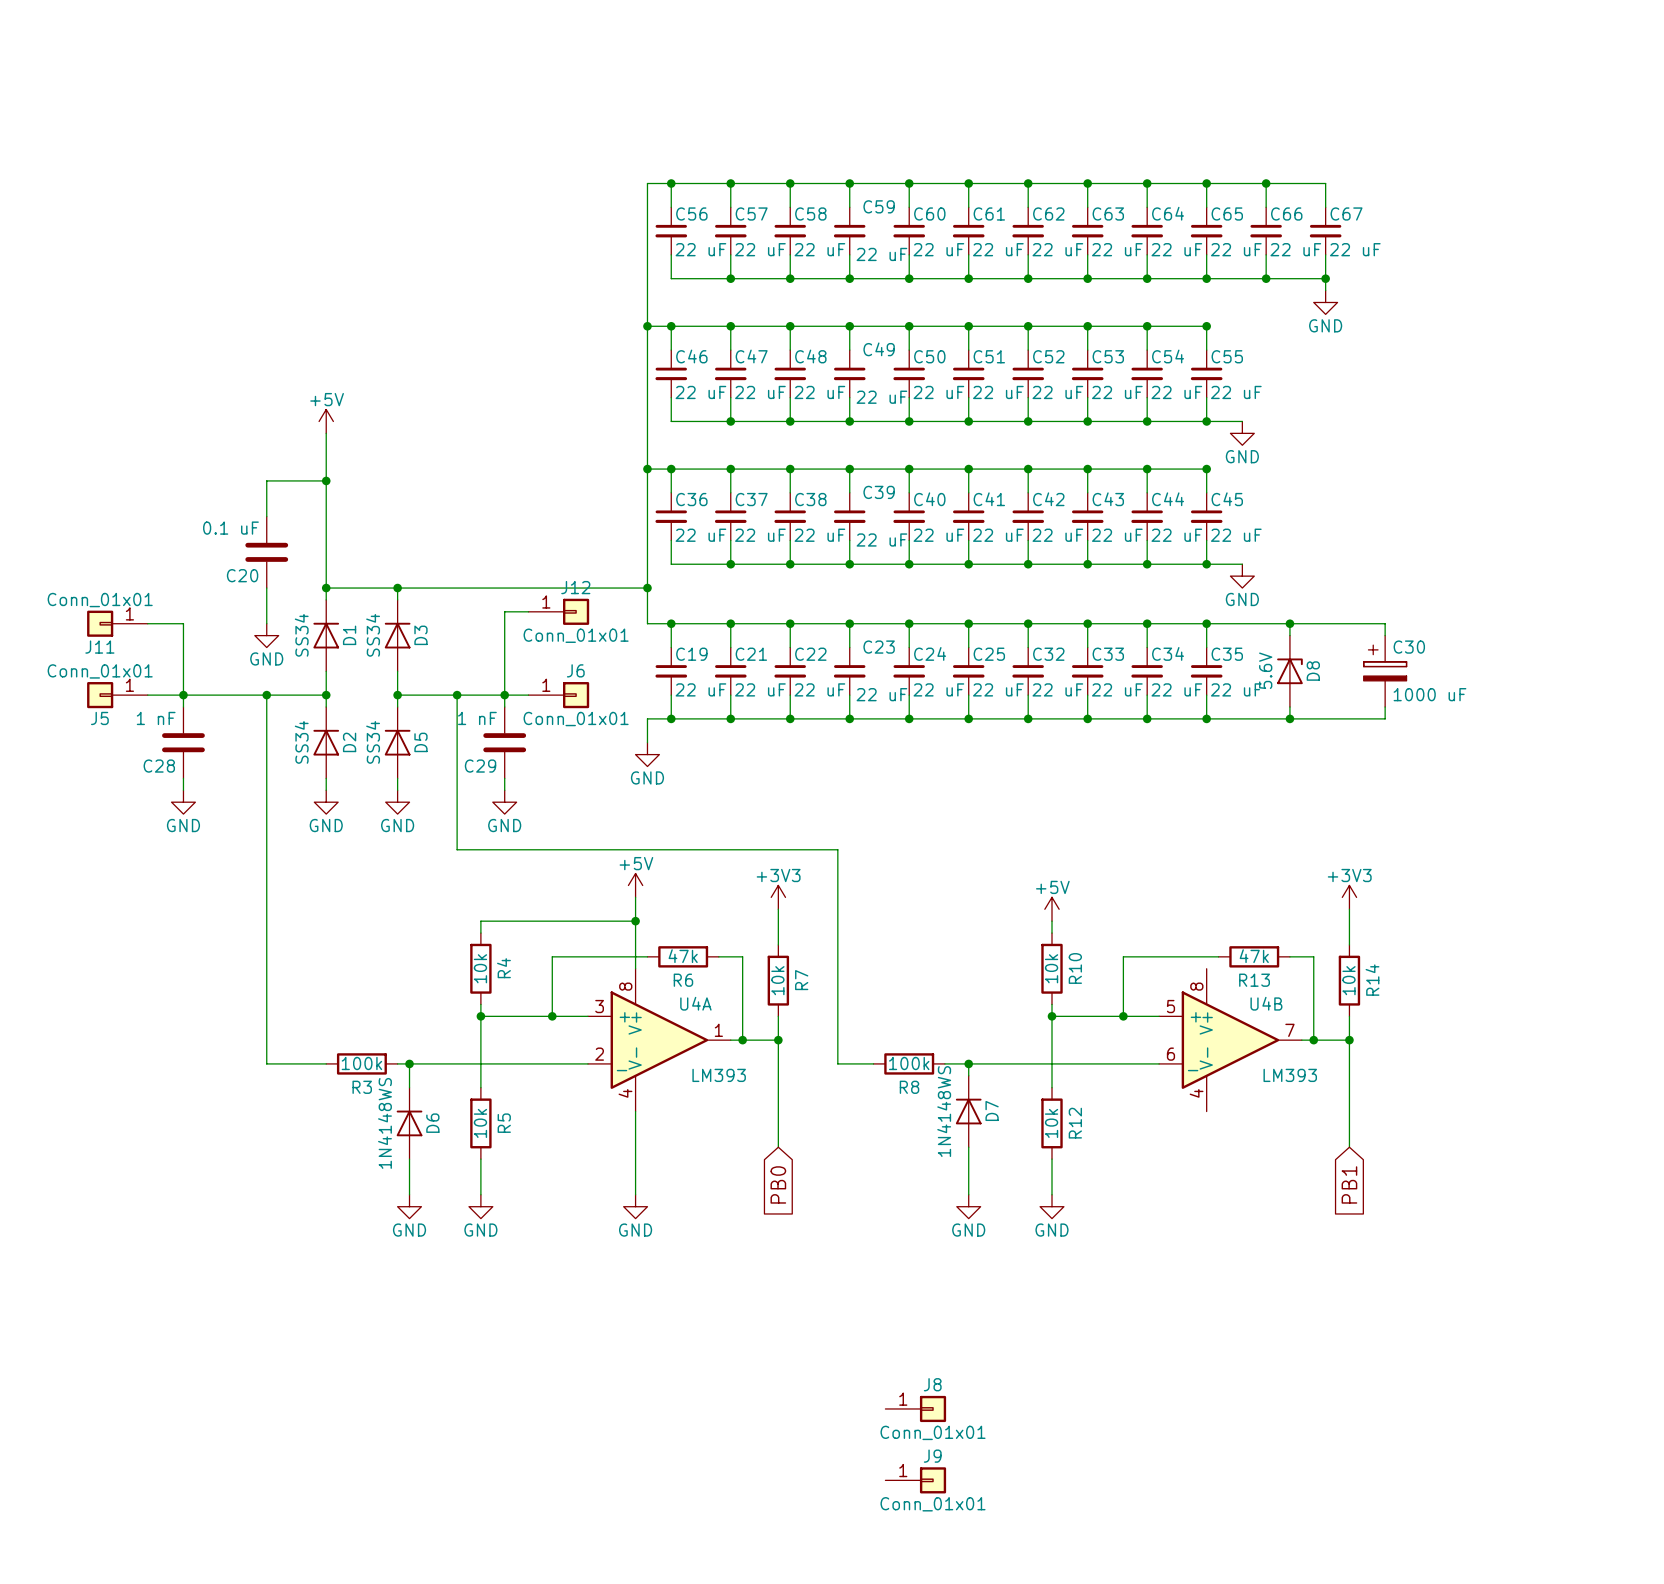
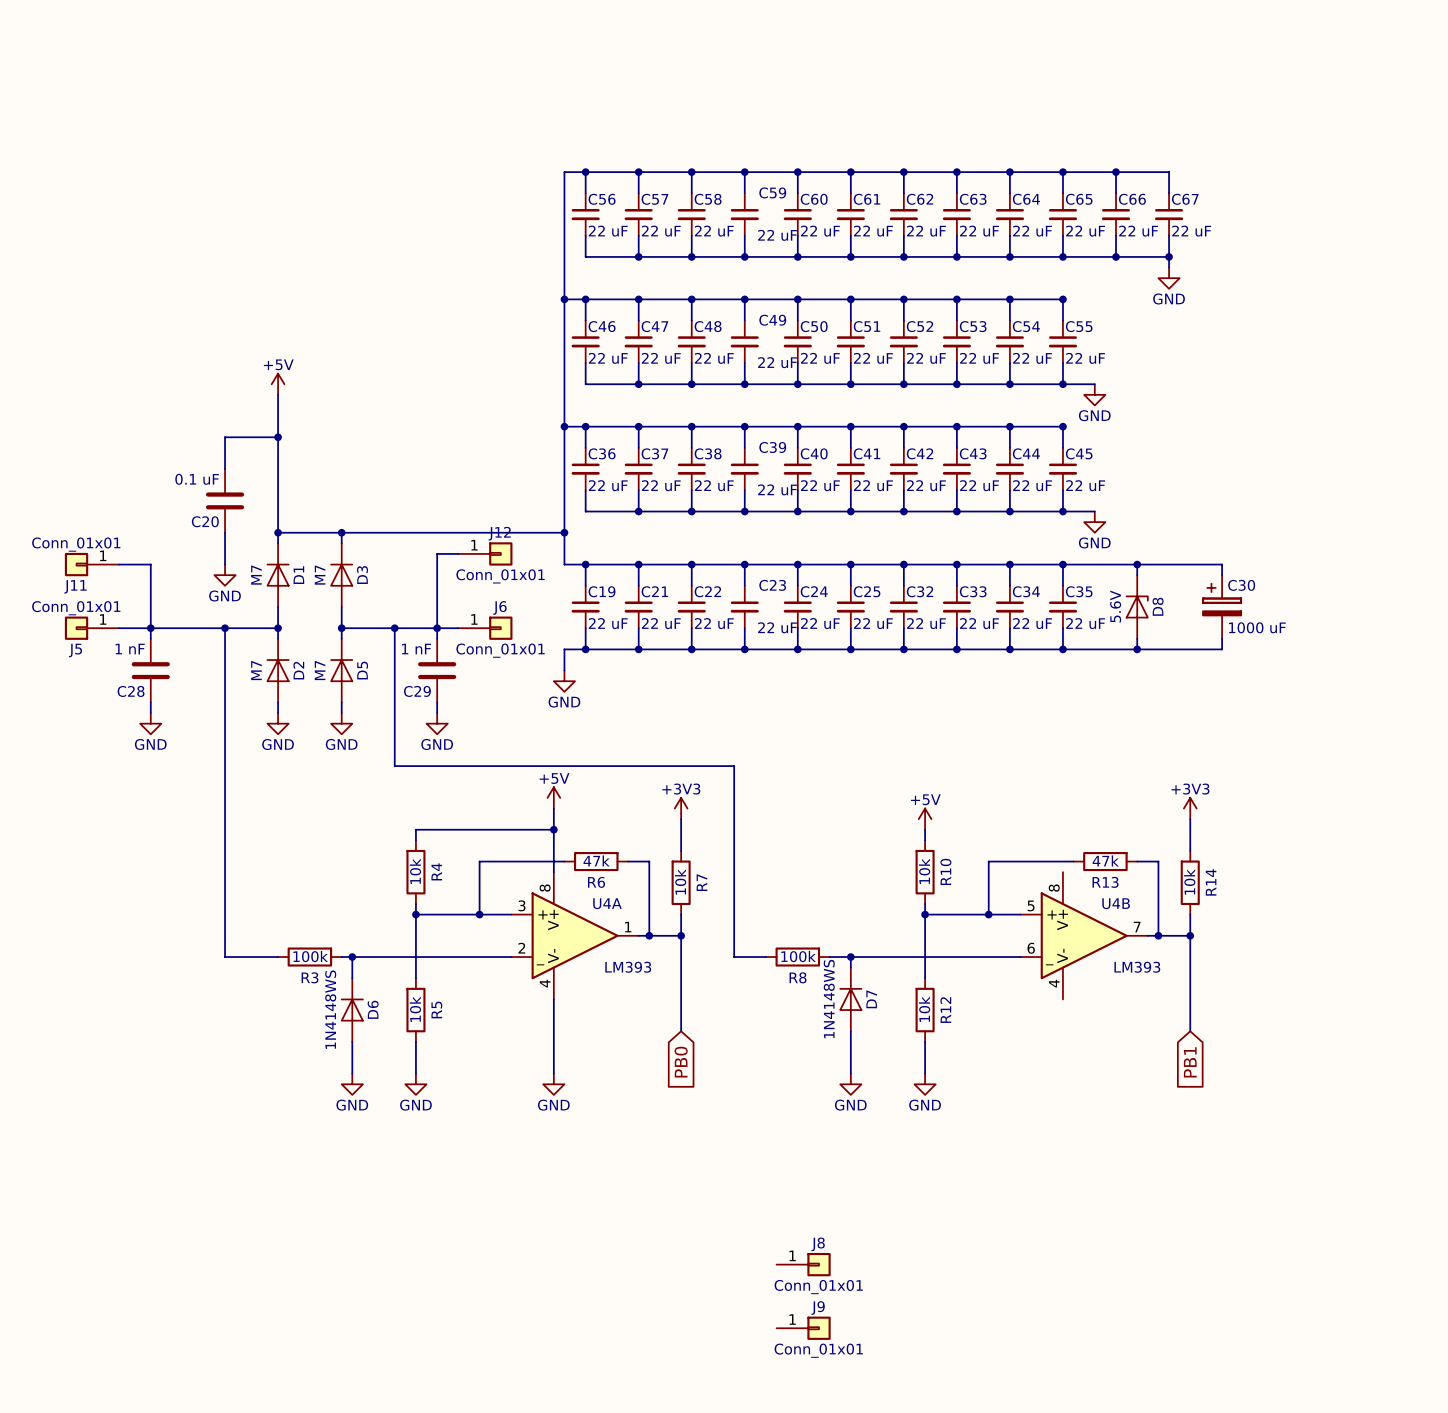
D1 value: SS34 (301, 635) -> M7 (256, 575)
D3 value: SS34 (373, 635) -> M7 (320, 575)
D2 value: SS34 (301, 742) -> M7 (256, 670)
D5 value: SS34 (373, 742) -> M7 (320, 670)

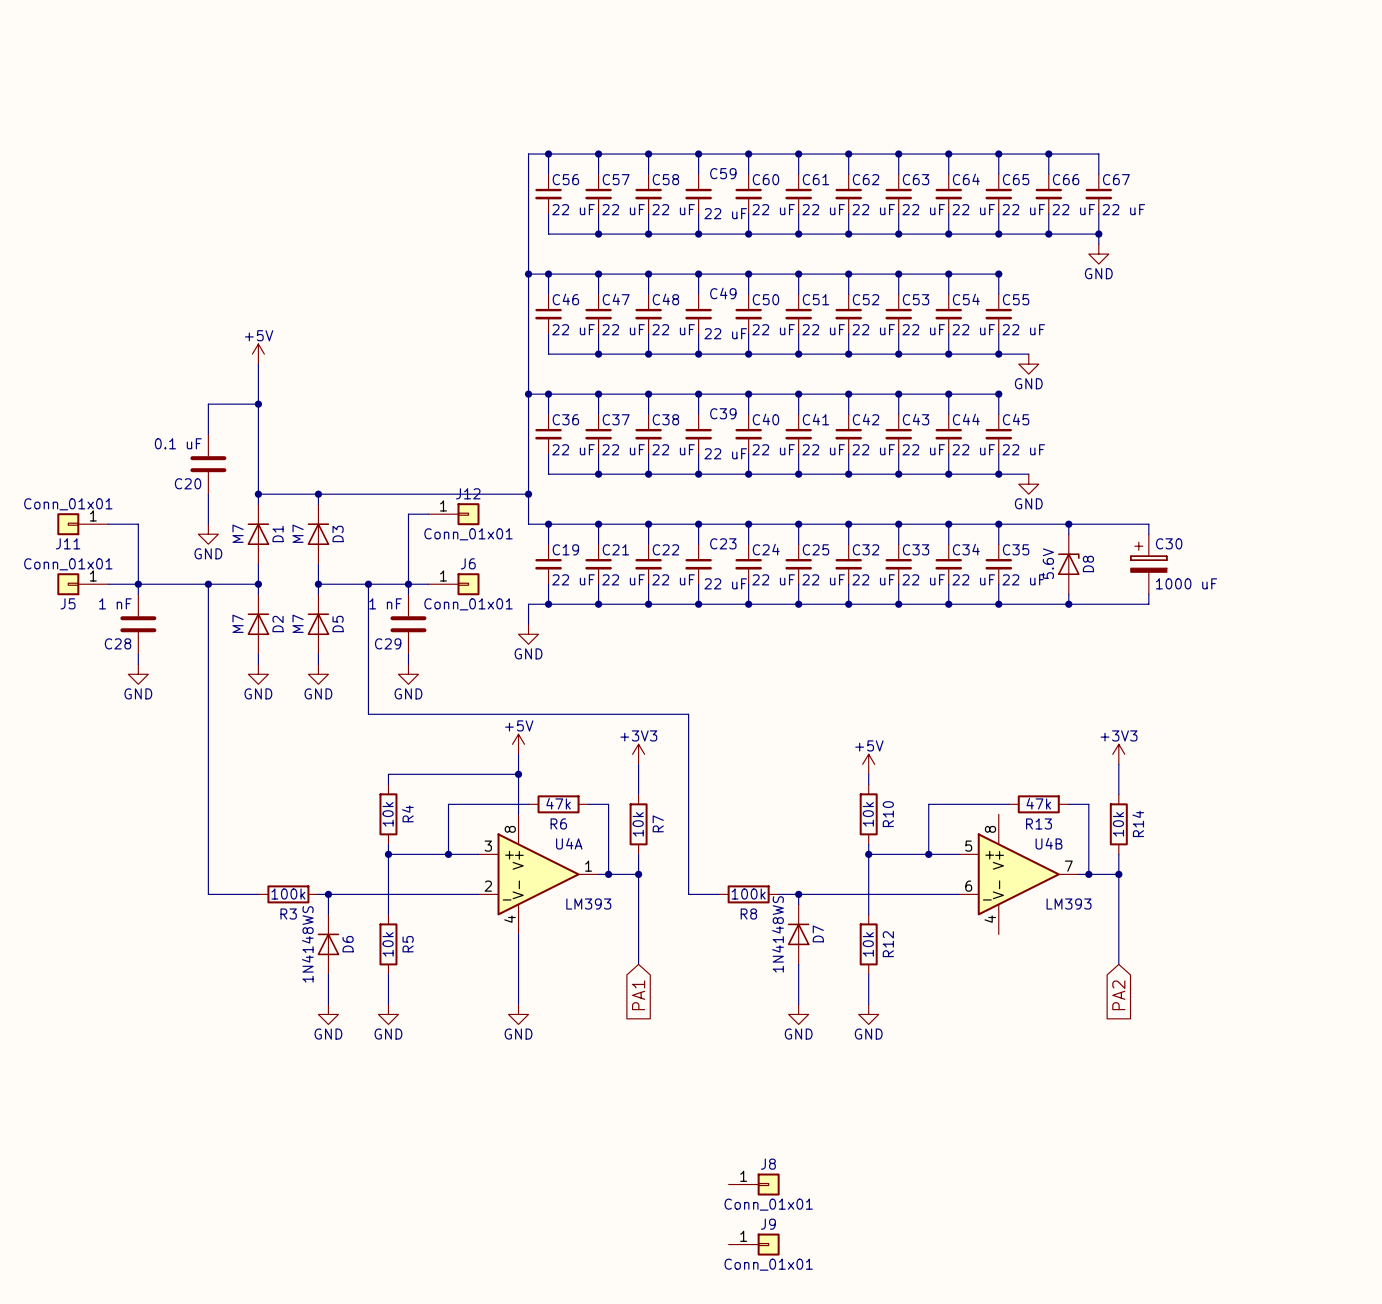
global label: PB0 (681, 1062) -> PA1 (638, 995)
global label: PB1 (1190, 1062) -> PA2 (1118, 995)

